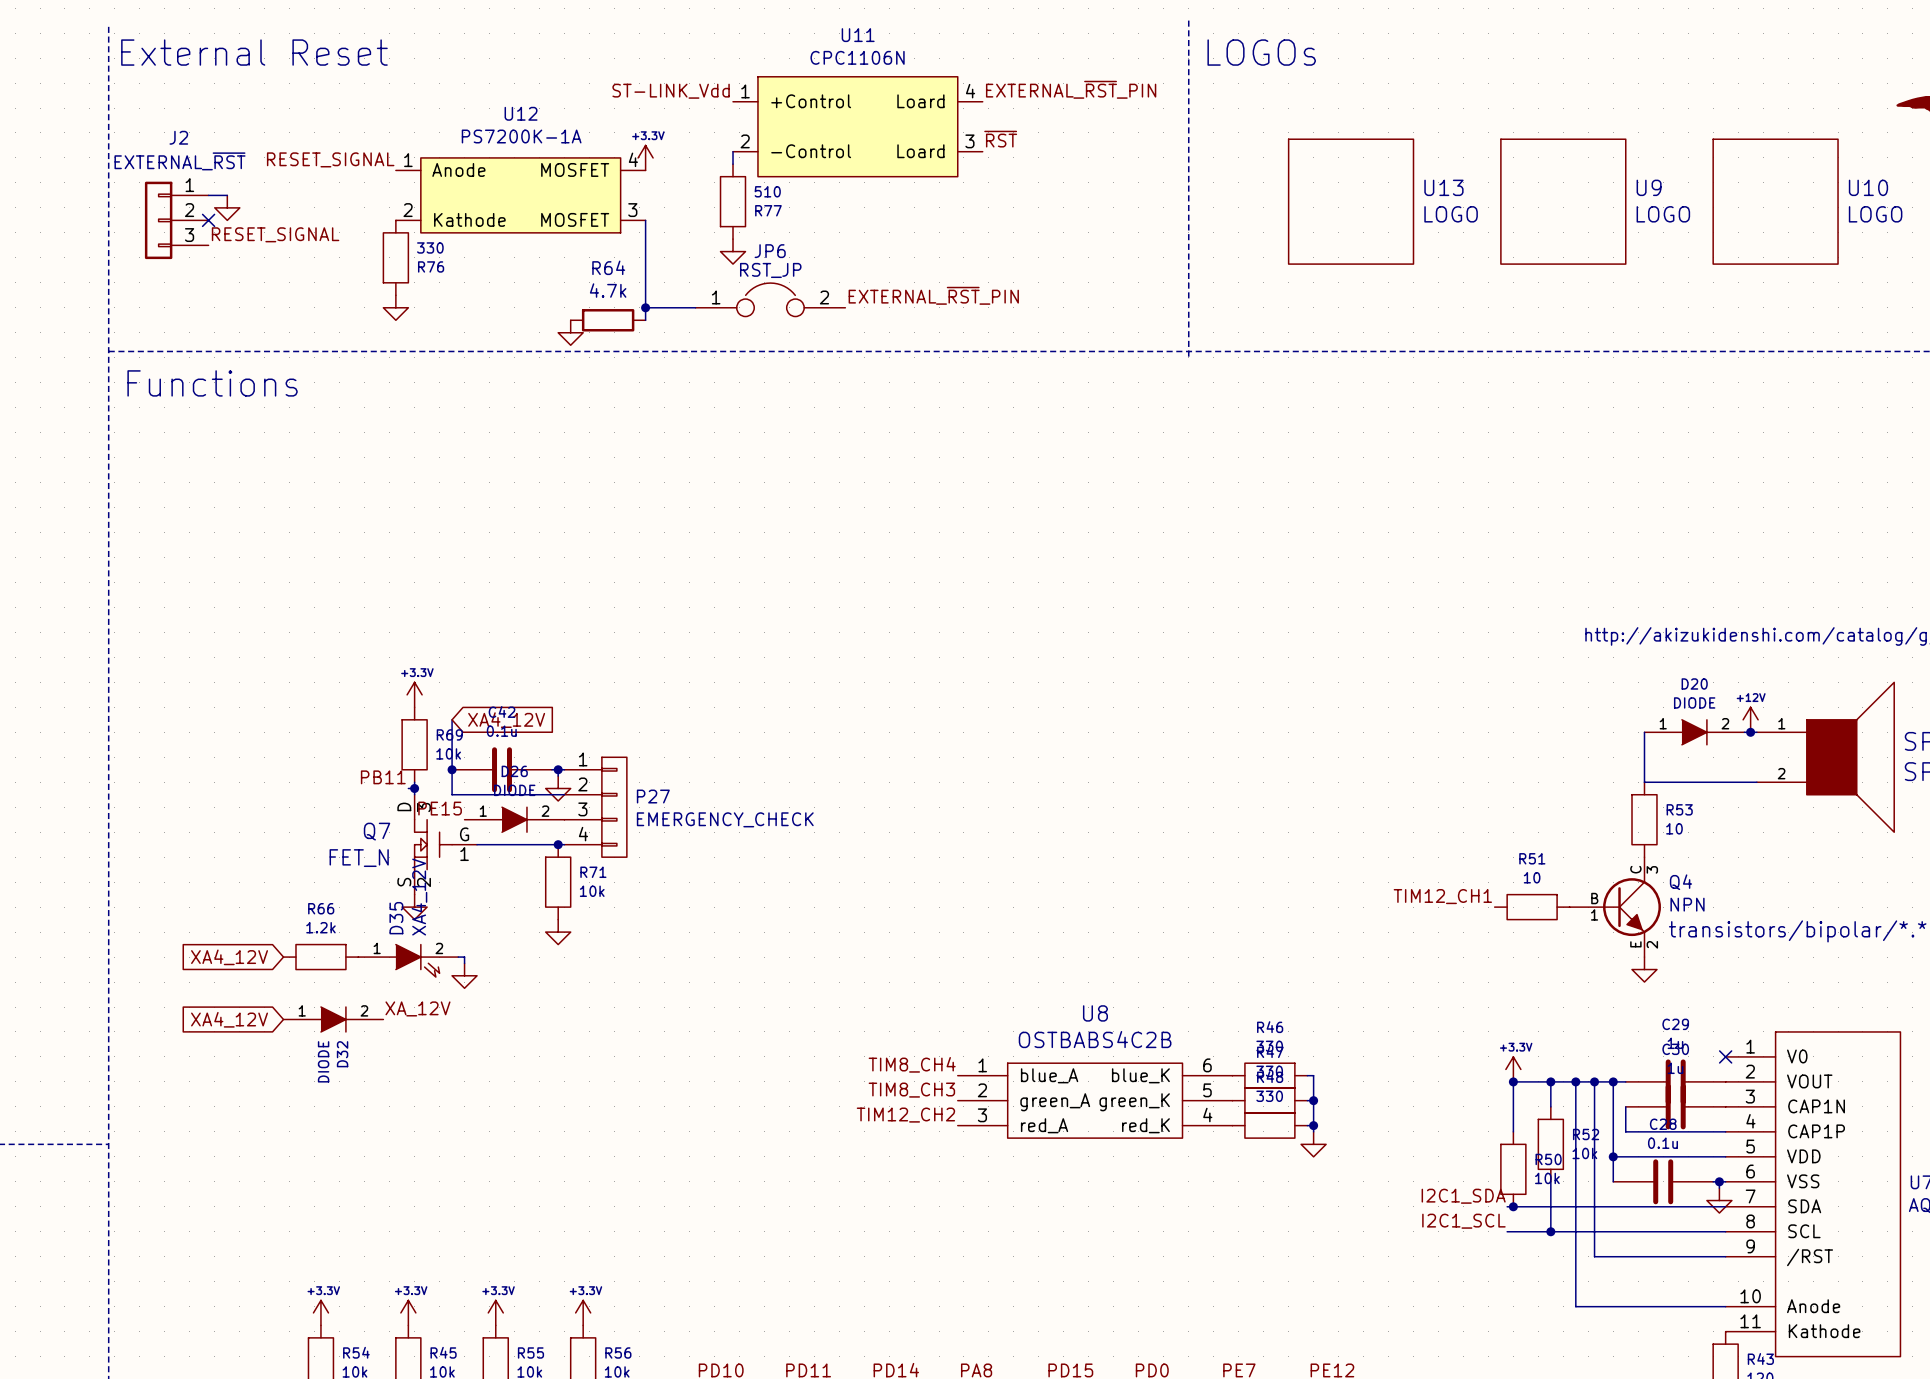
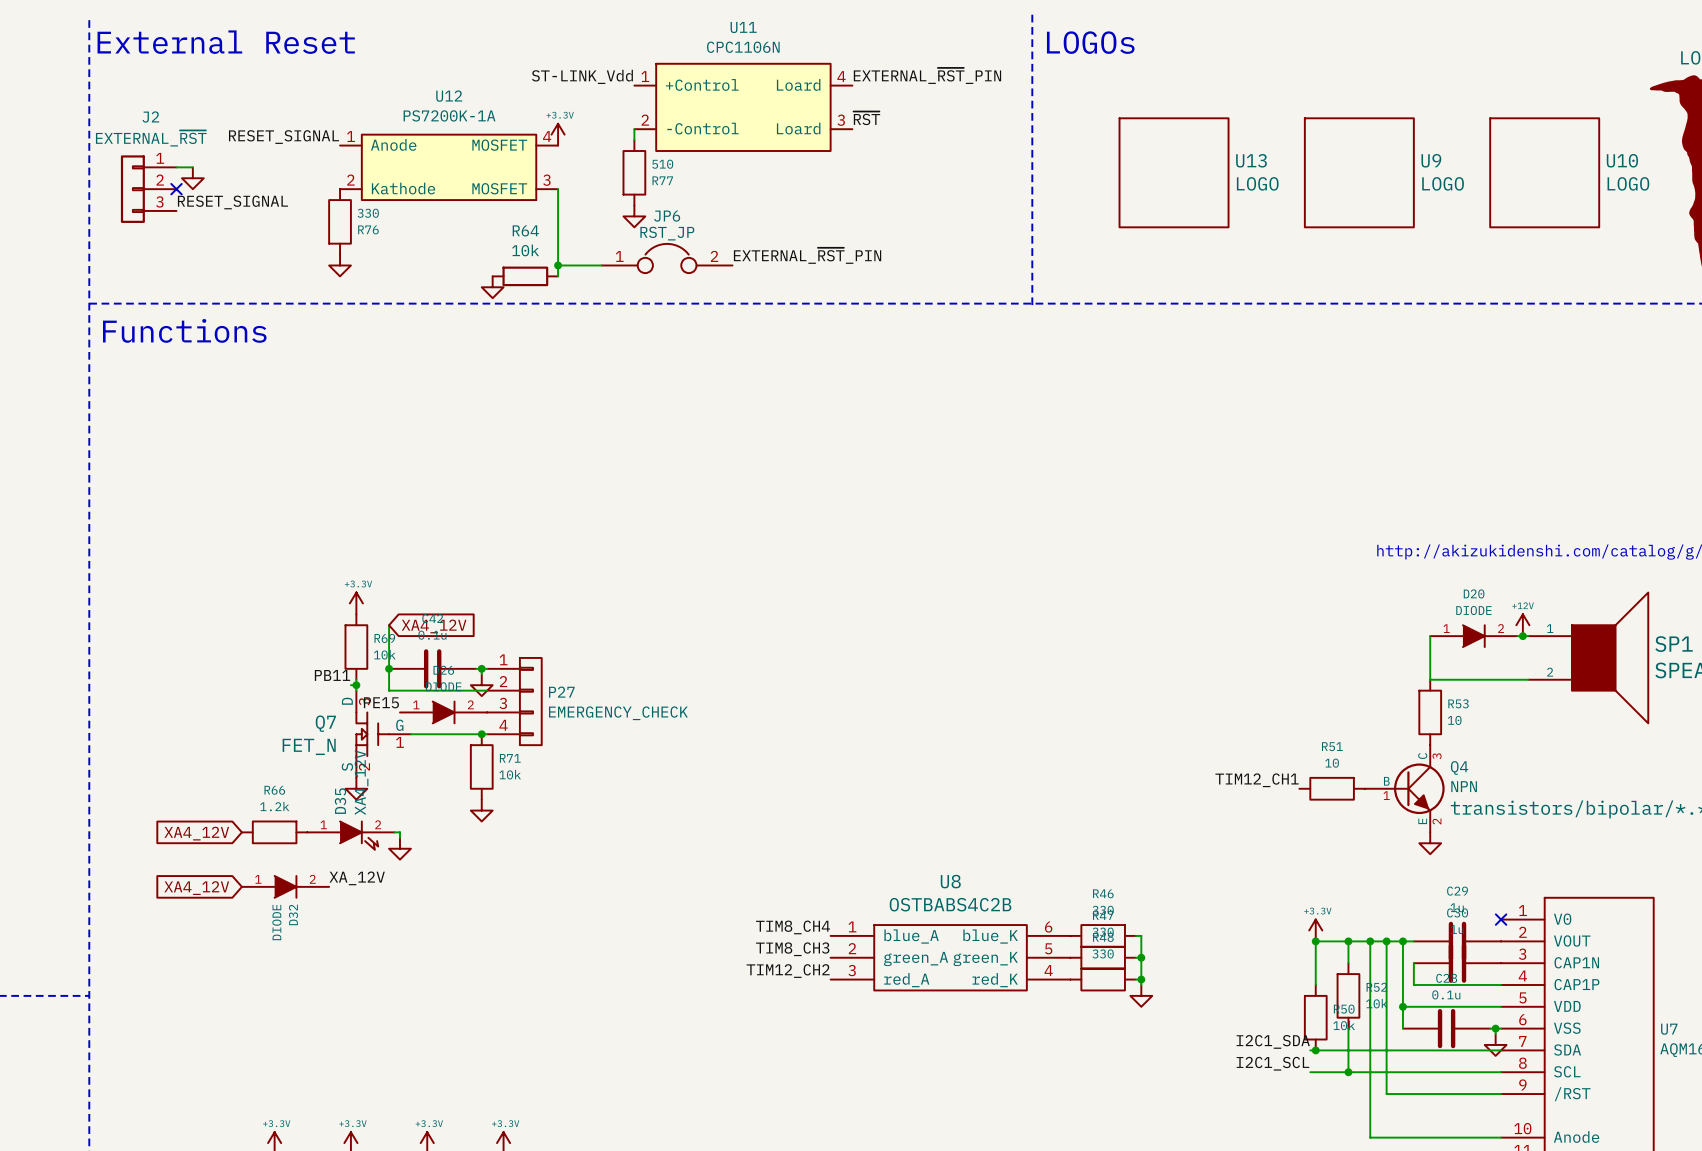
R64 value: 4.7k (608, 290) -> 10k (525, 250)

